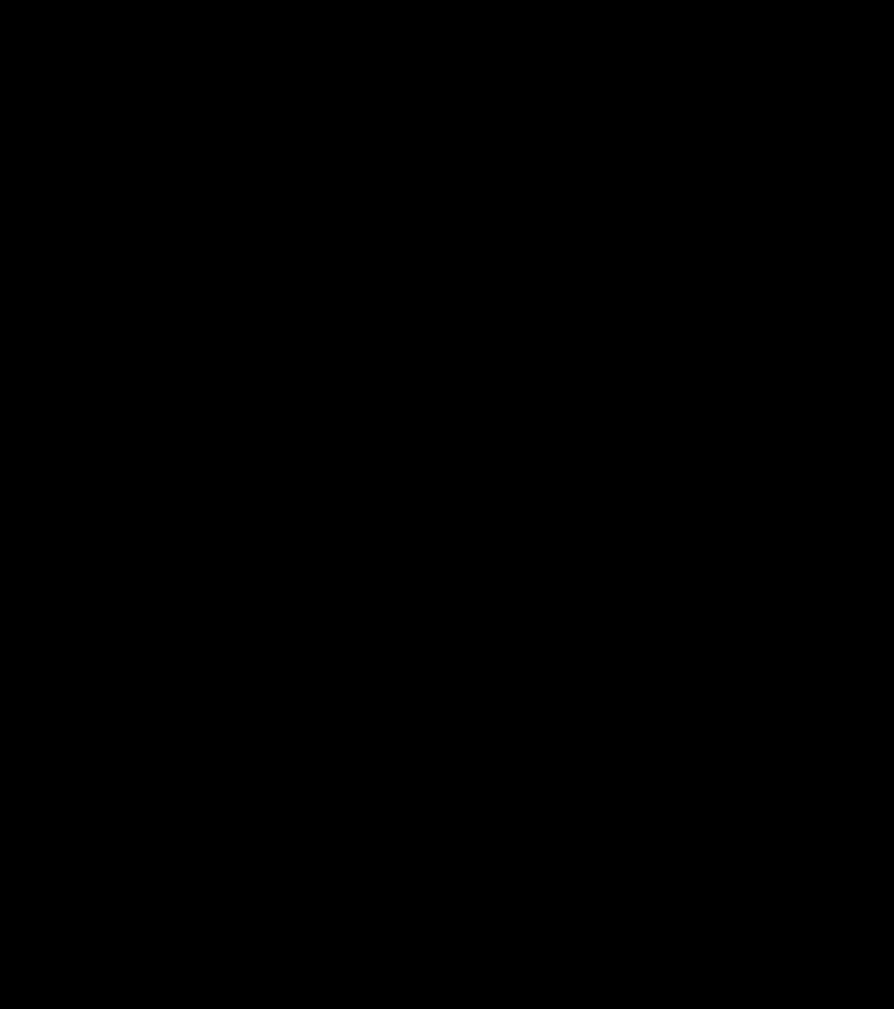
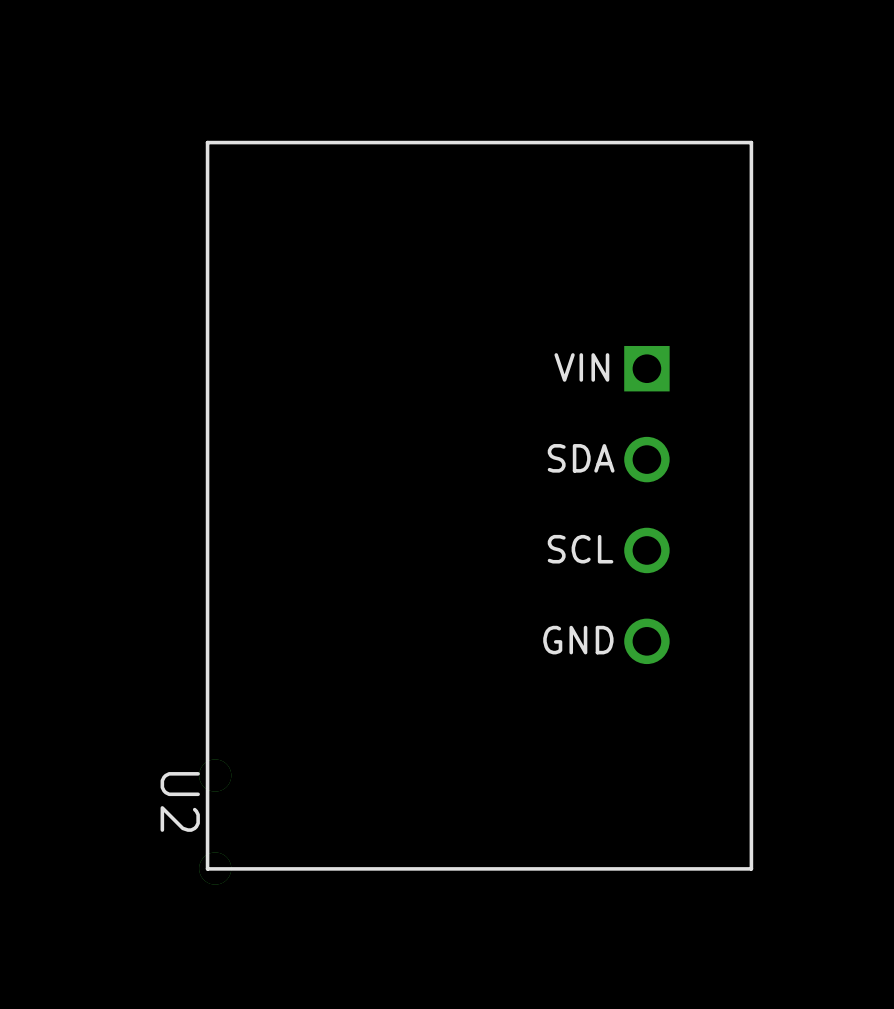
U2: none -> (479, 505)

